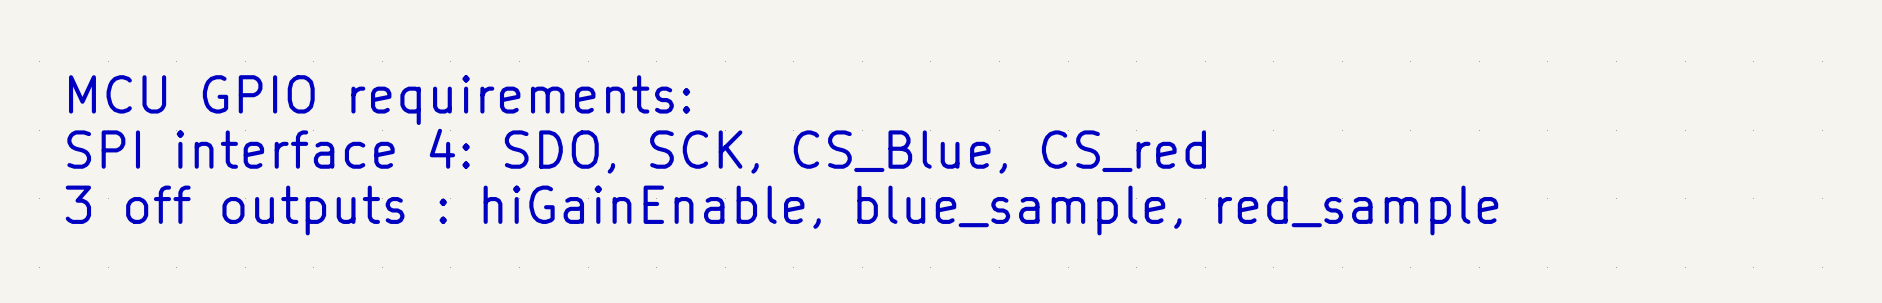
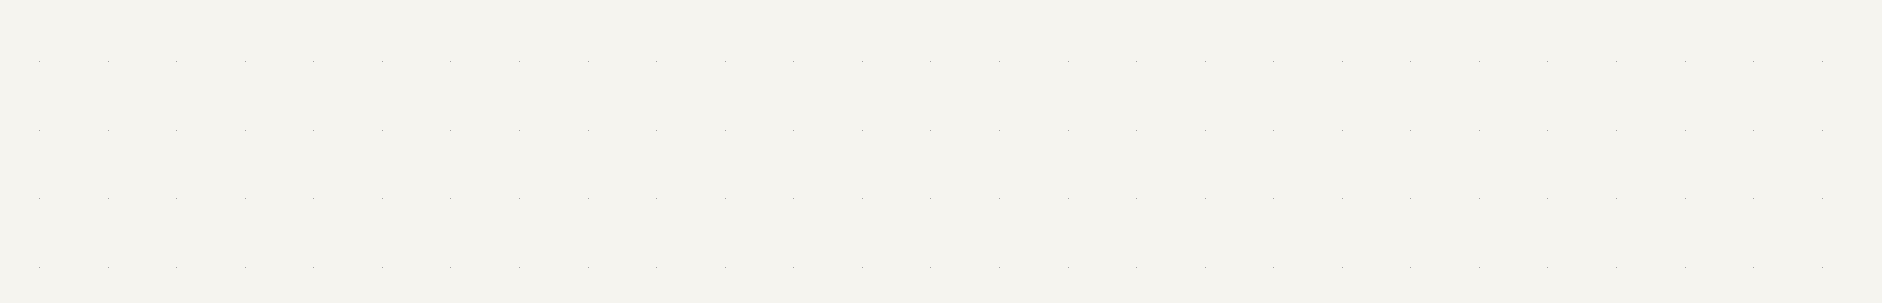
text: MCU GPIO requirements: (379, 100) -> none
text: SPI interface 4: SDO, SCK, CS_Blue, CS_red (636, 151) -> none
text: 3 off outputs : hiGainEnable, blue_sample, red_sample (781, 210) -> none

